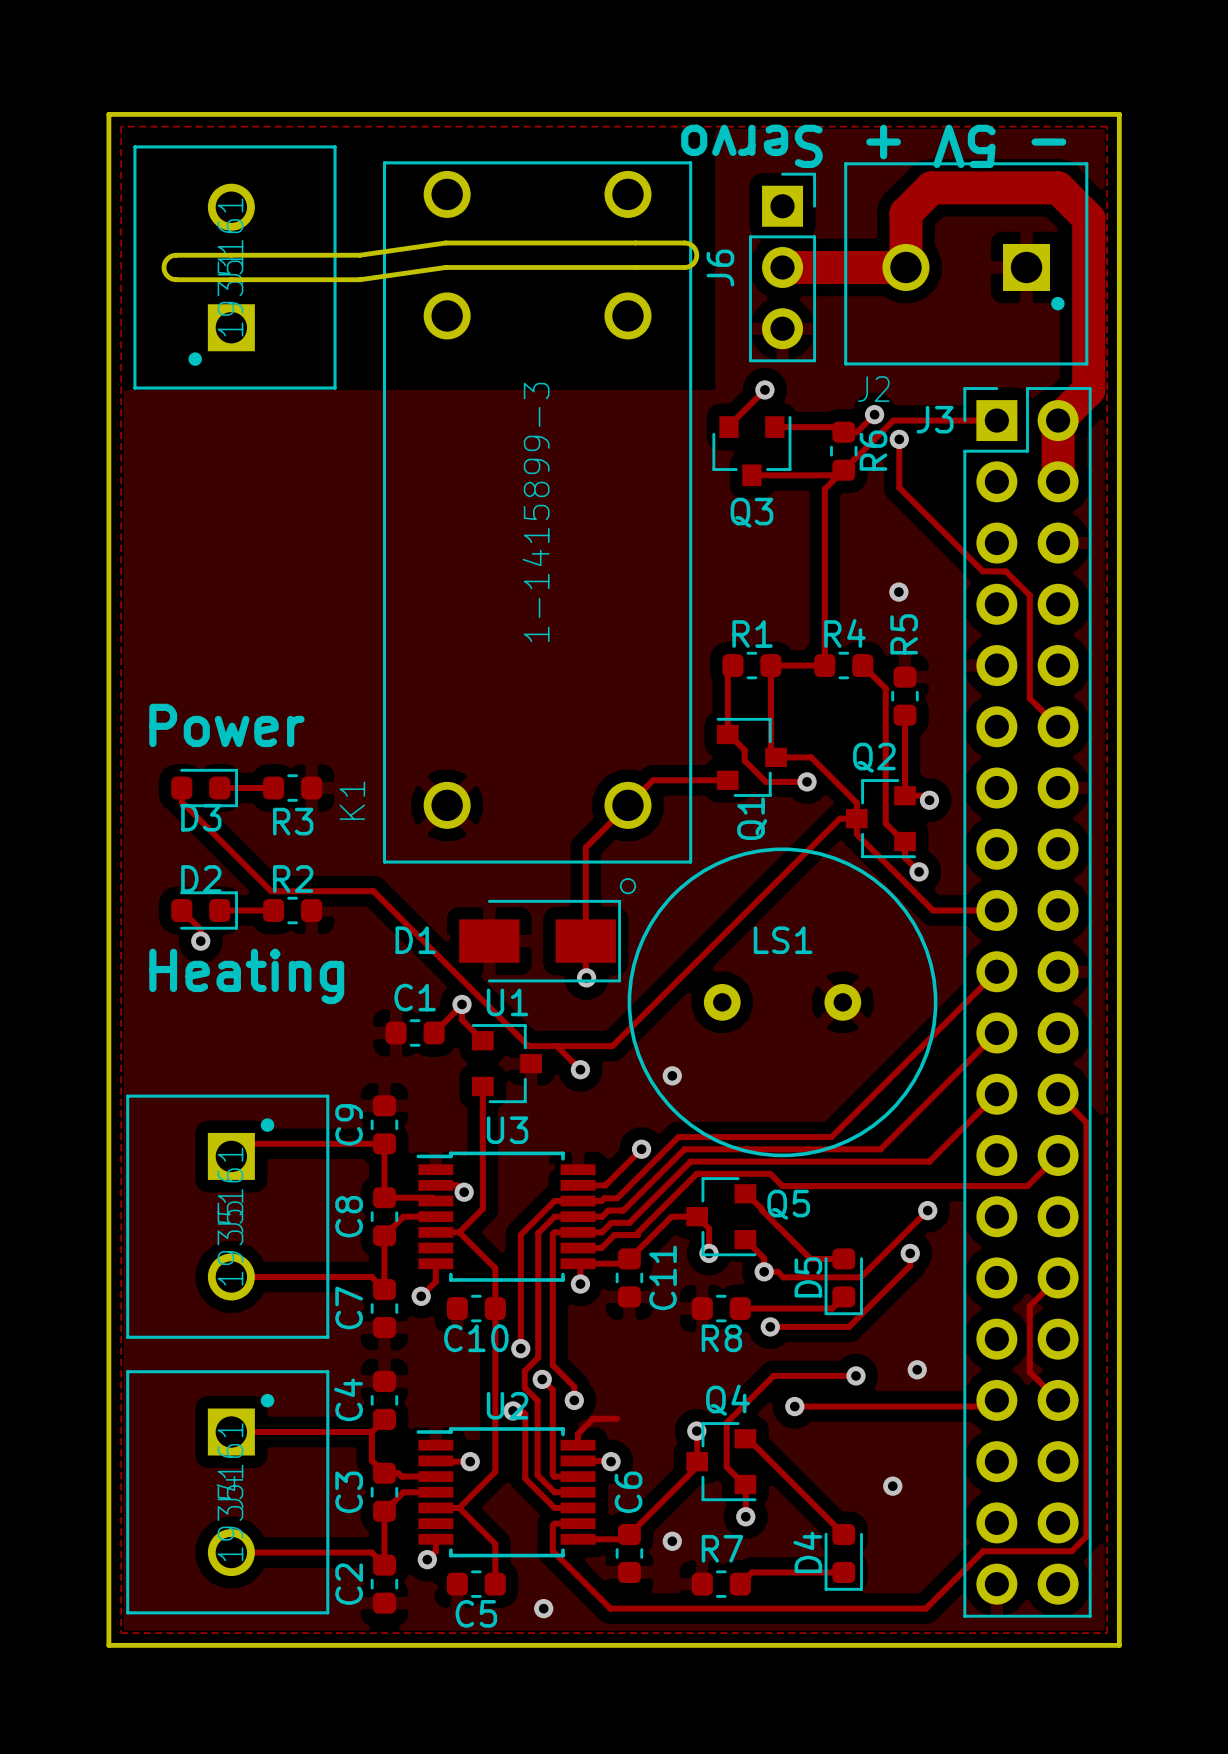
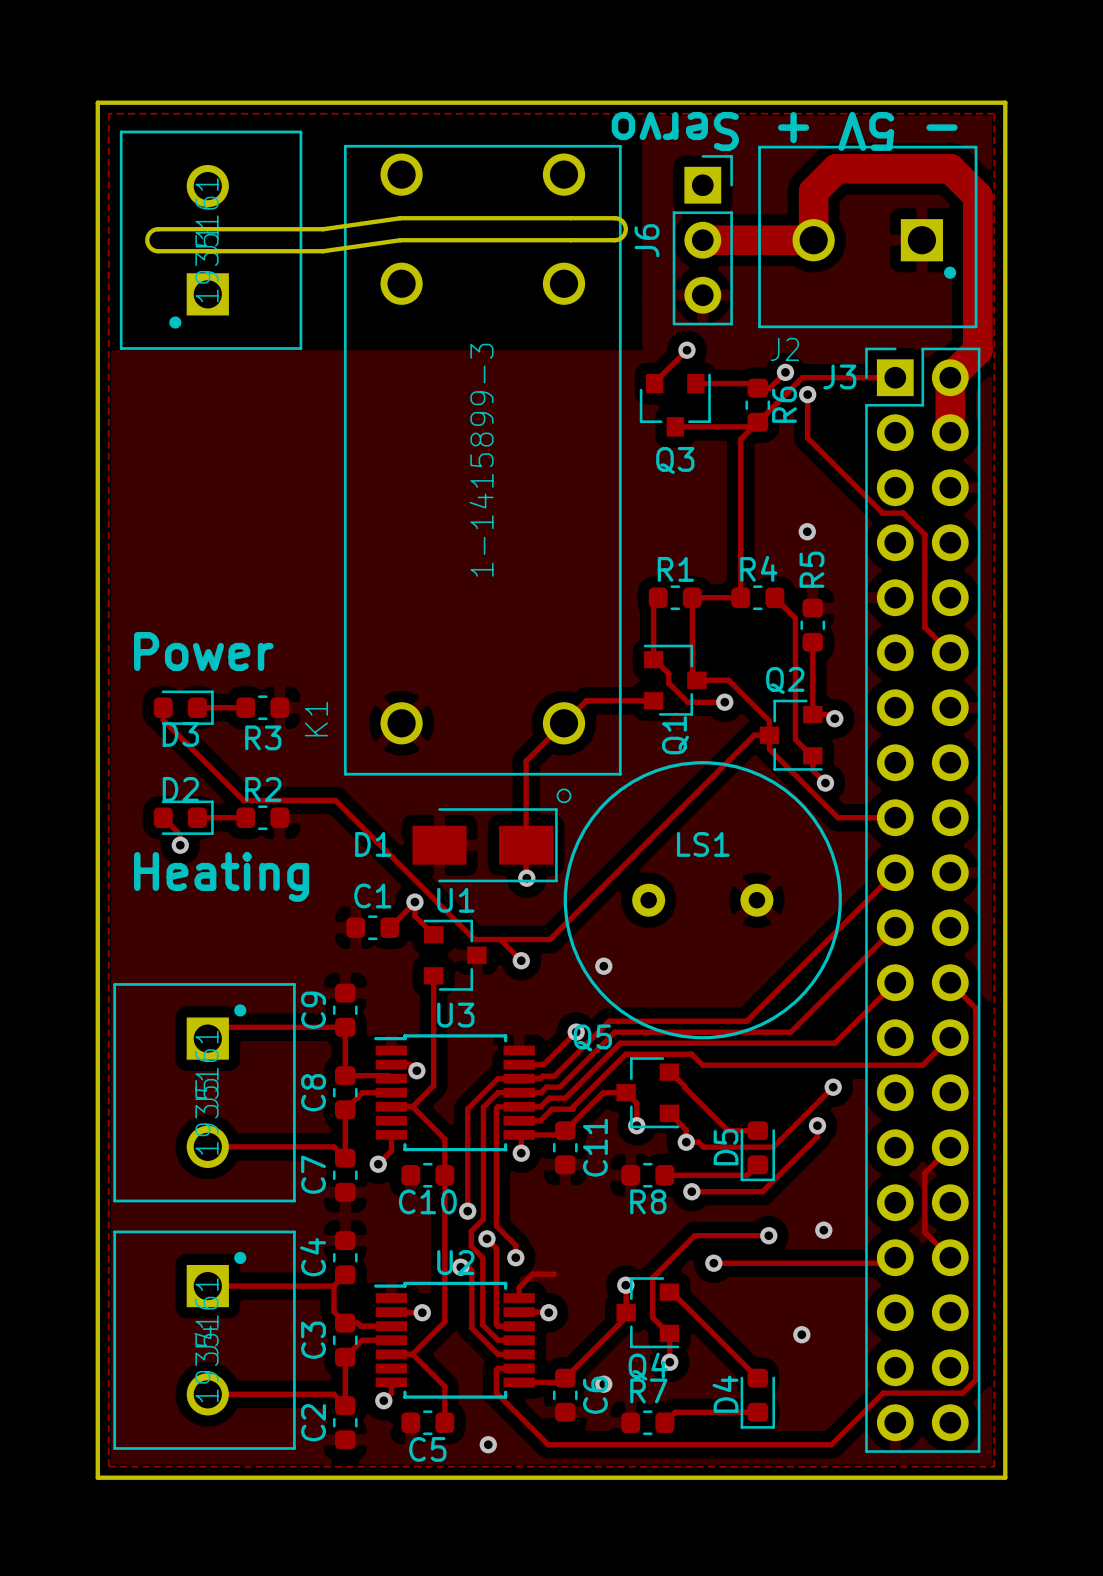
Q5 name position: Q5 (788, 1204) -> Q5 (592, 1037)
Q4 name position: Q4 (727, 1400) -> Q4 (648, 1366)
C6 name position: C6 (628, 1492) -> C6 (595, 1395)

